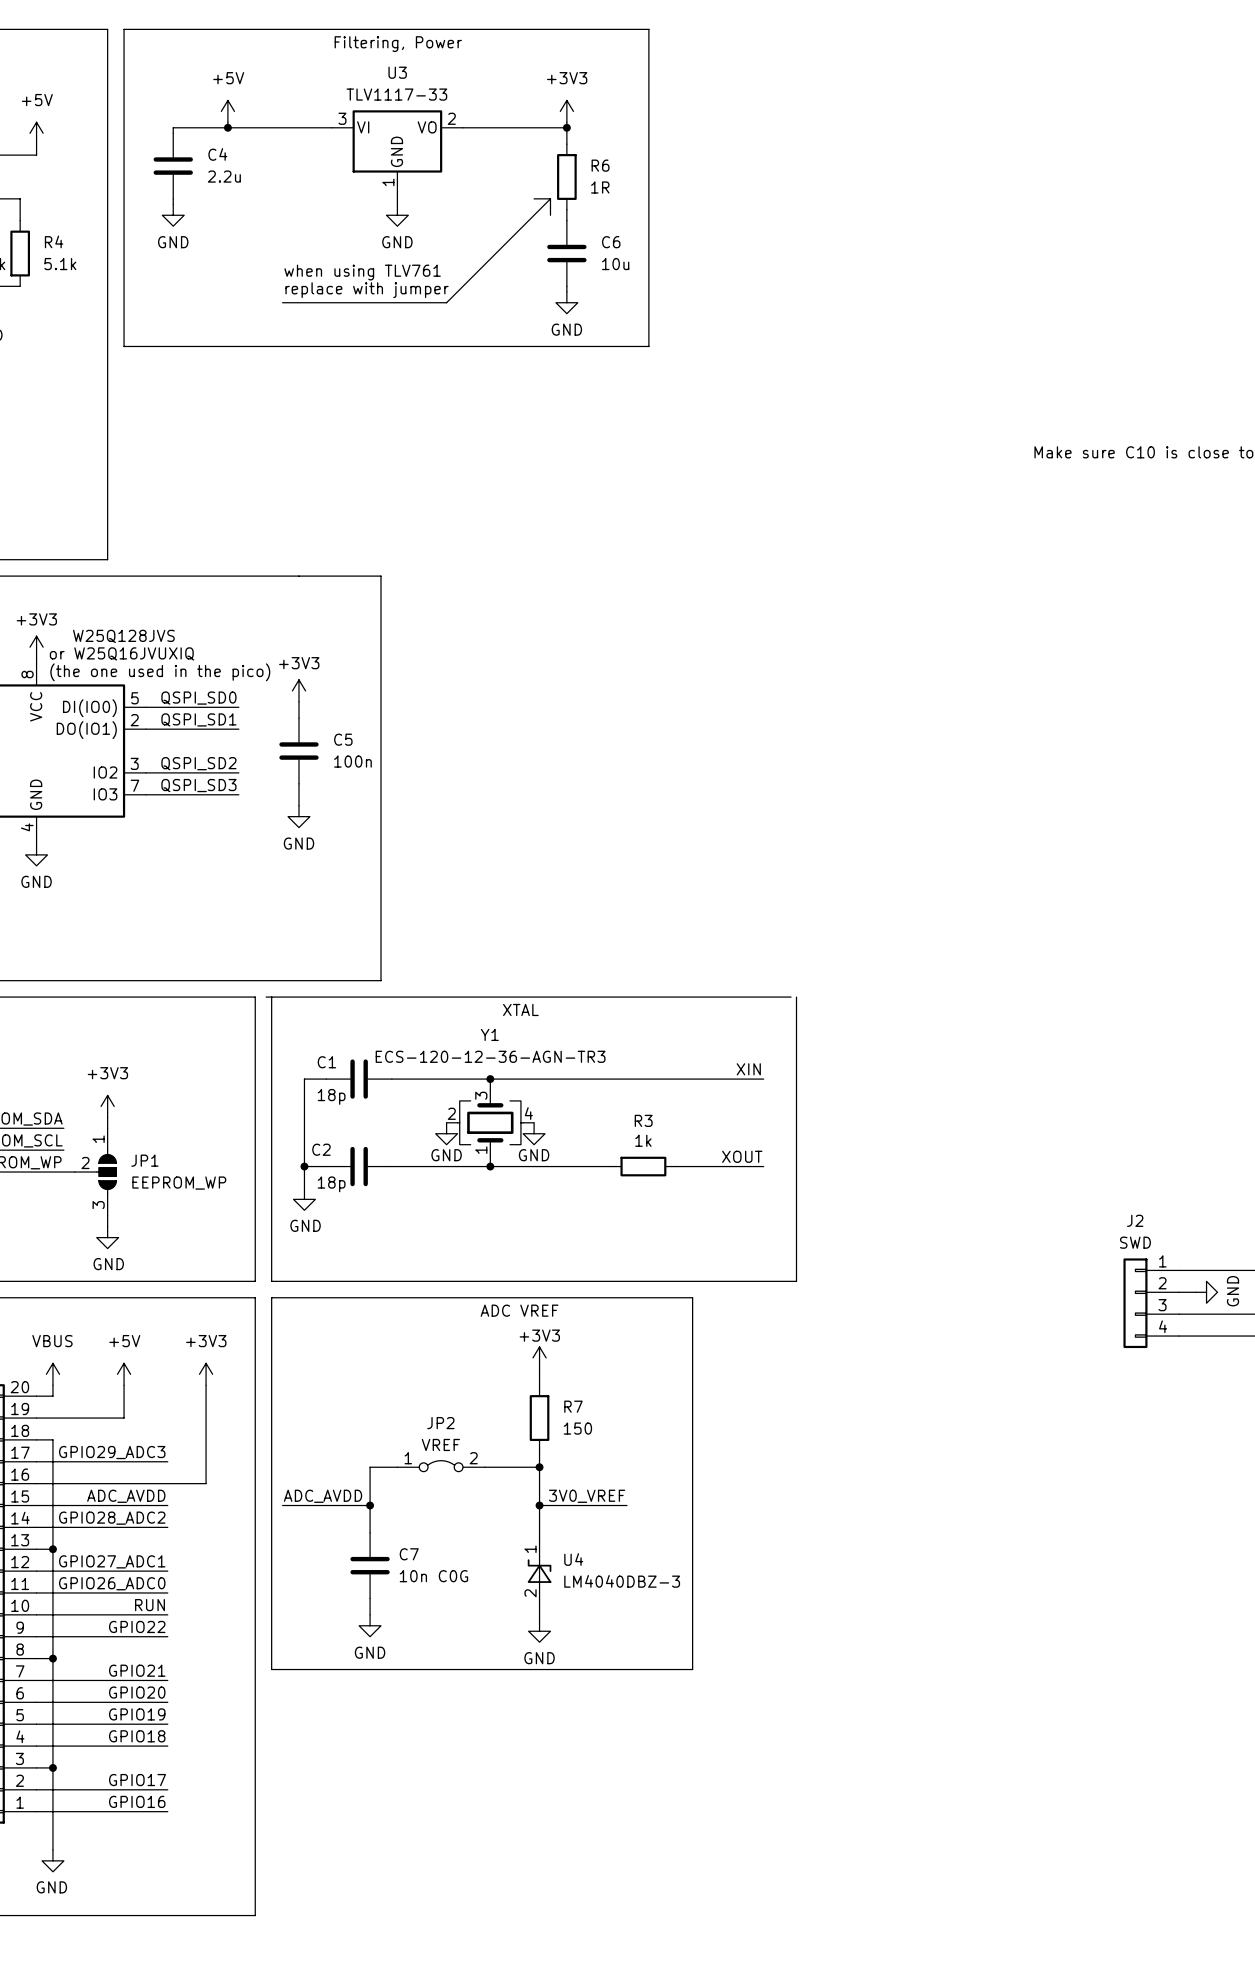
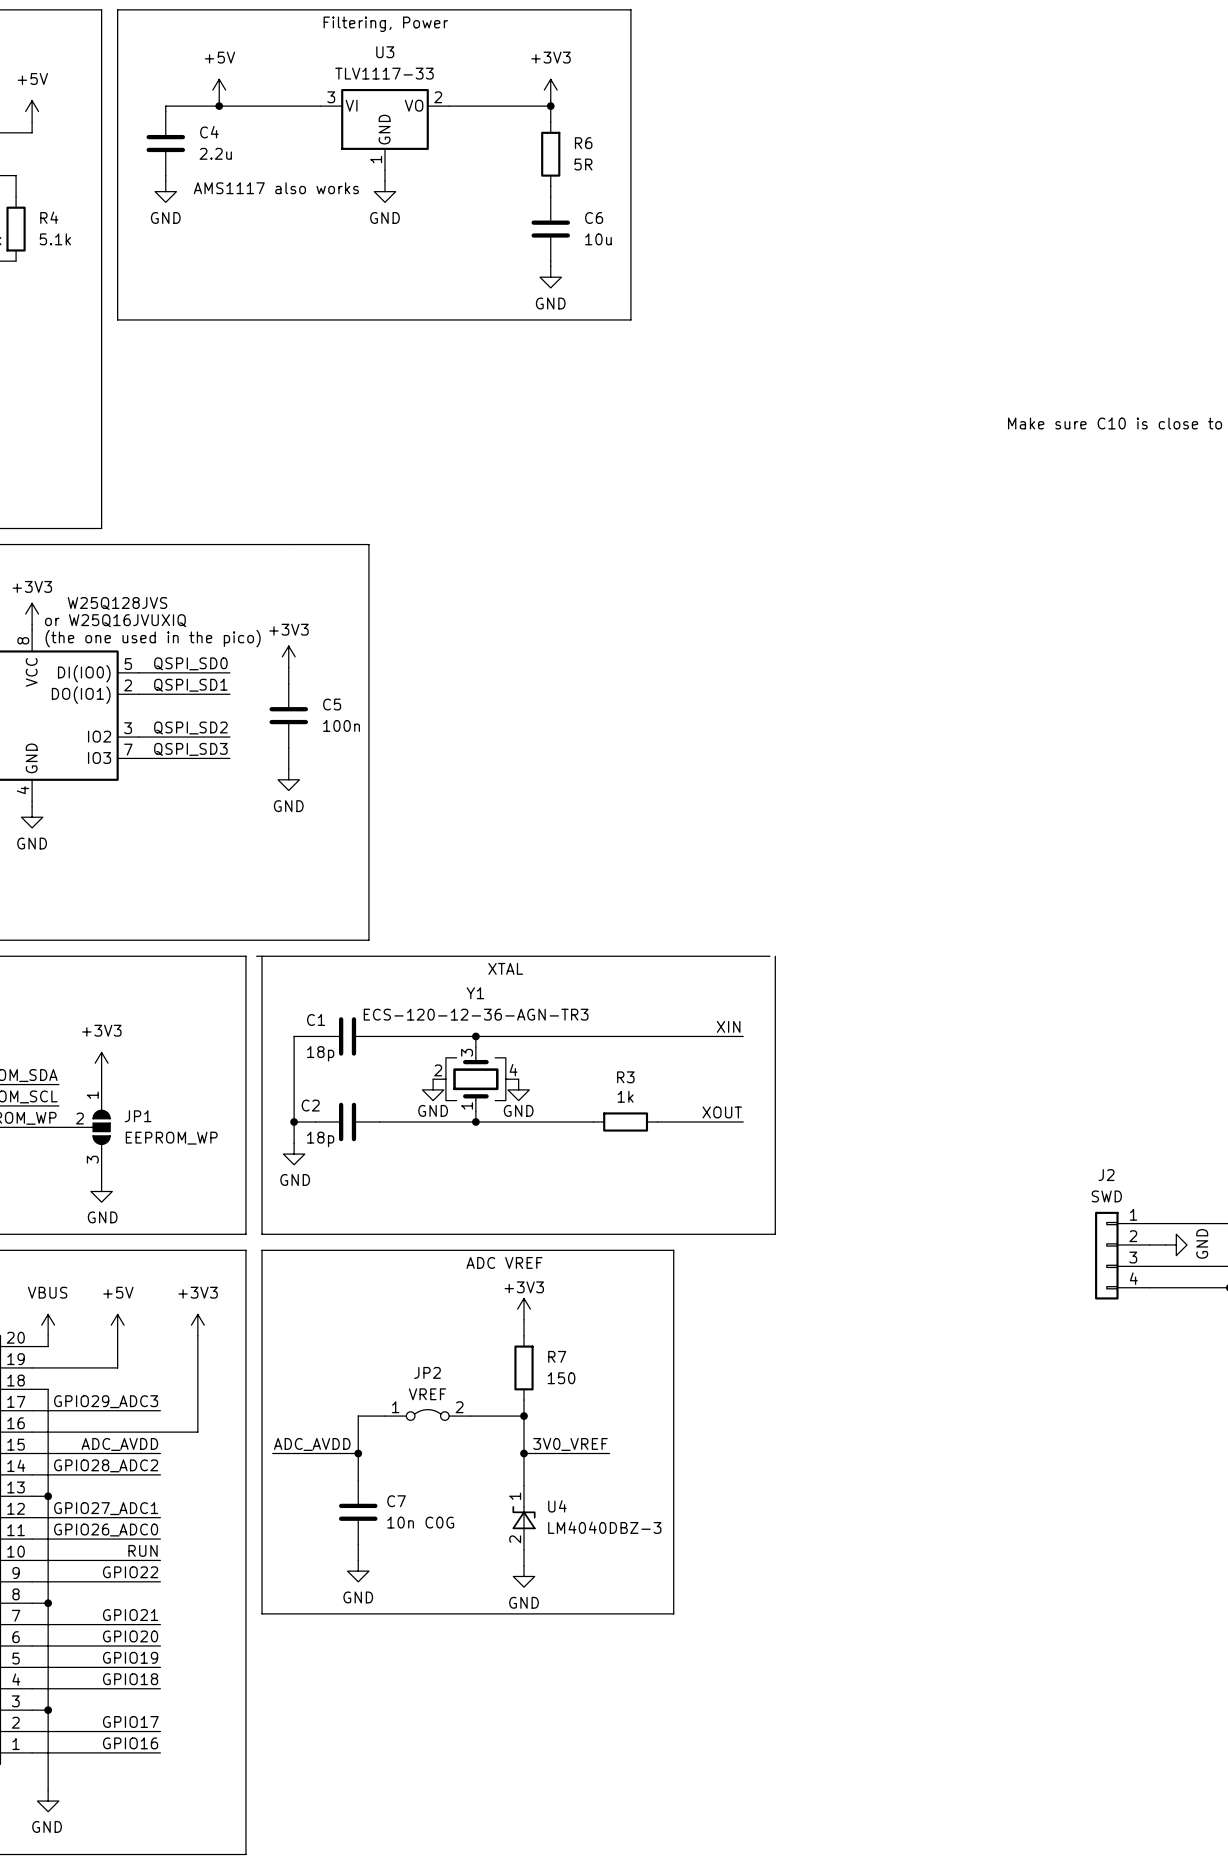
R6 value: 1R (600, 187) -> 5R (583, 164)
line: (534, 198) (550, 198) -> none
line: (550, 198) (446, 302) (282, 302) -> none
line: (550, 198) (550, 215) -> none
text: none -> AMS1117 also works (276, 188)
text: when using TLV761 (362, 272) -> none
text: replace with jumper (367, 290) -> none

